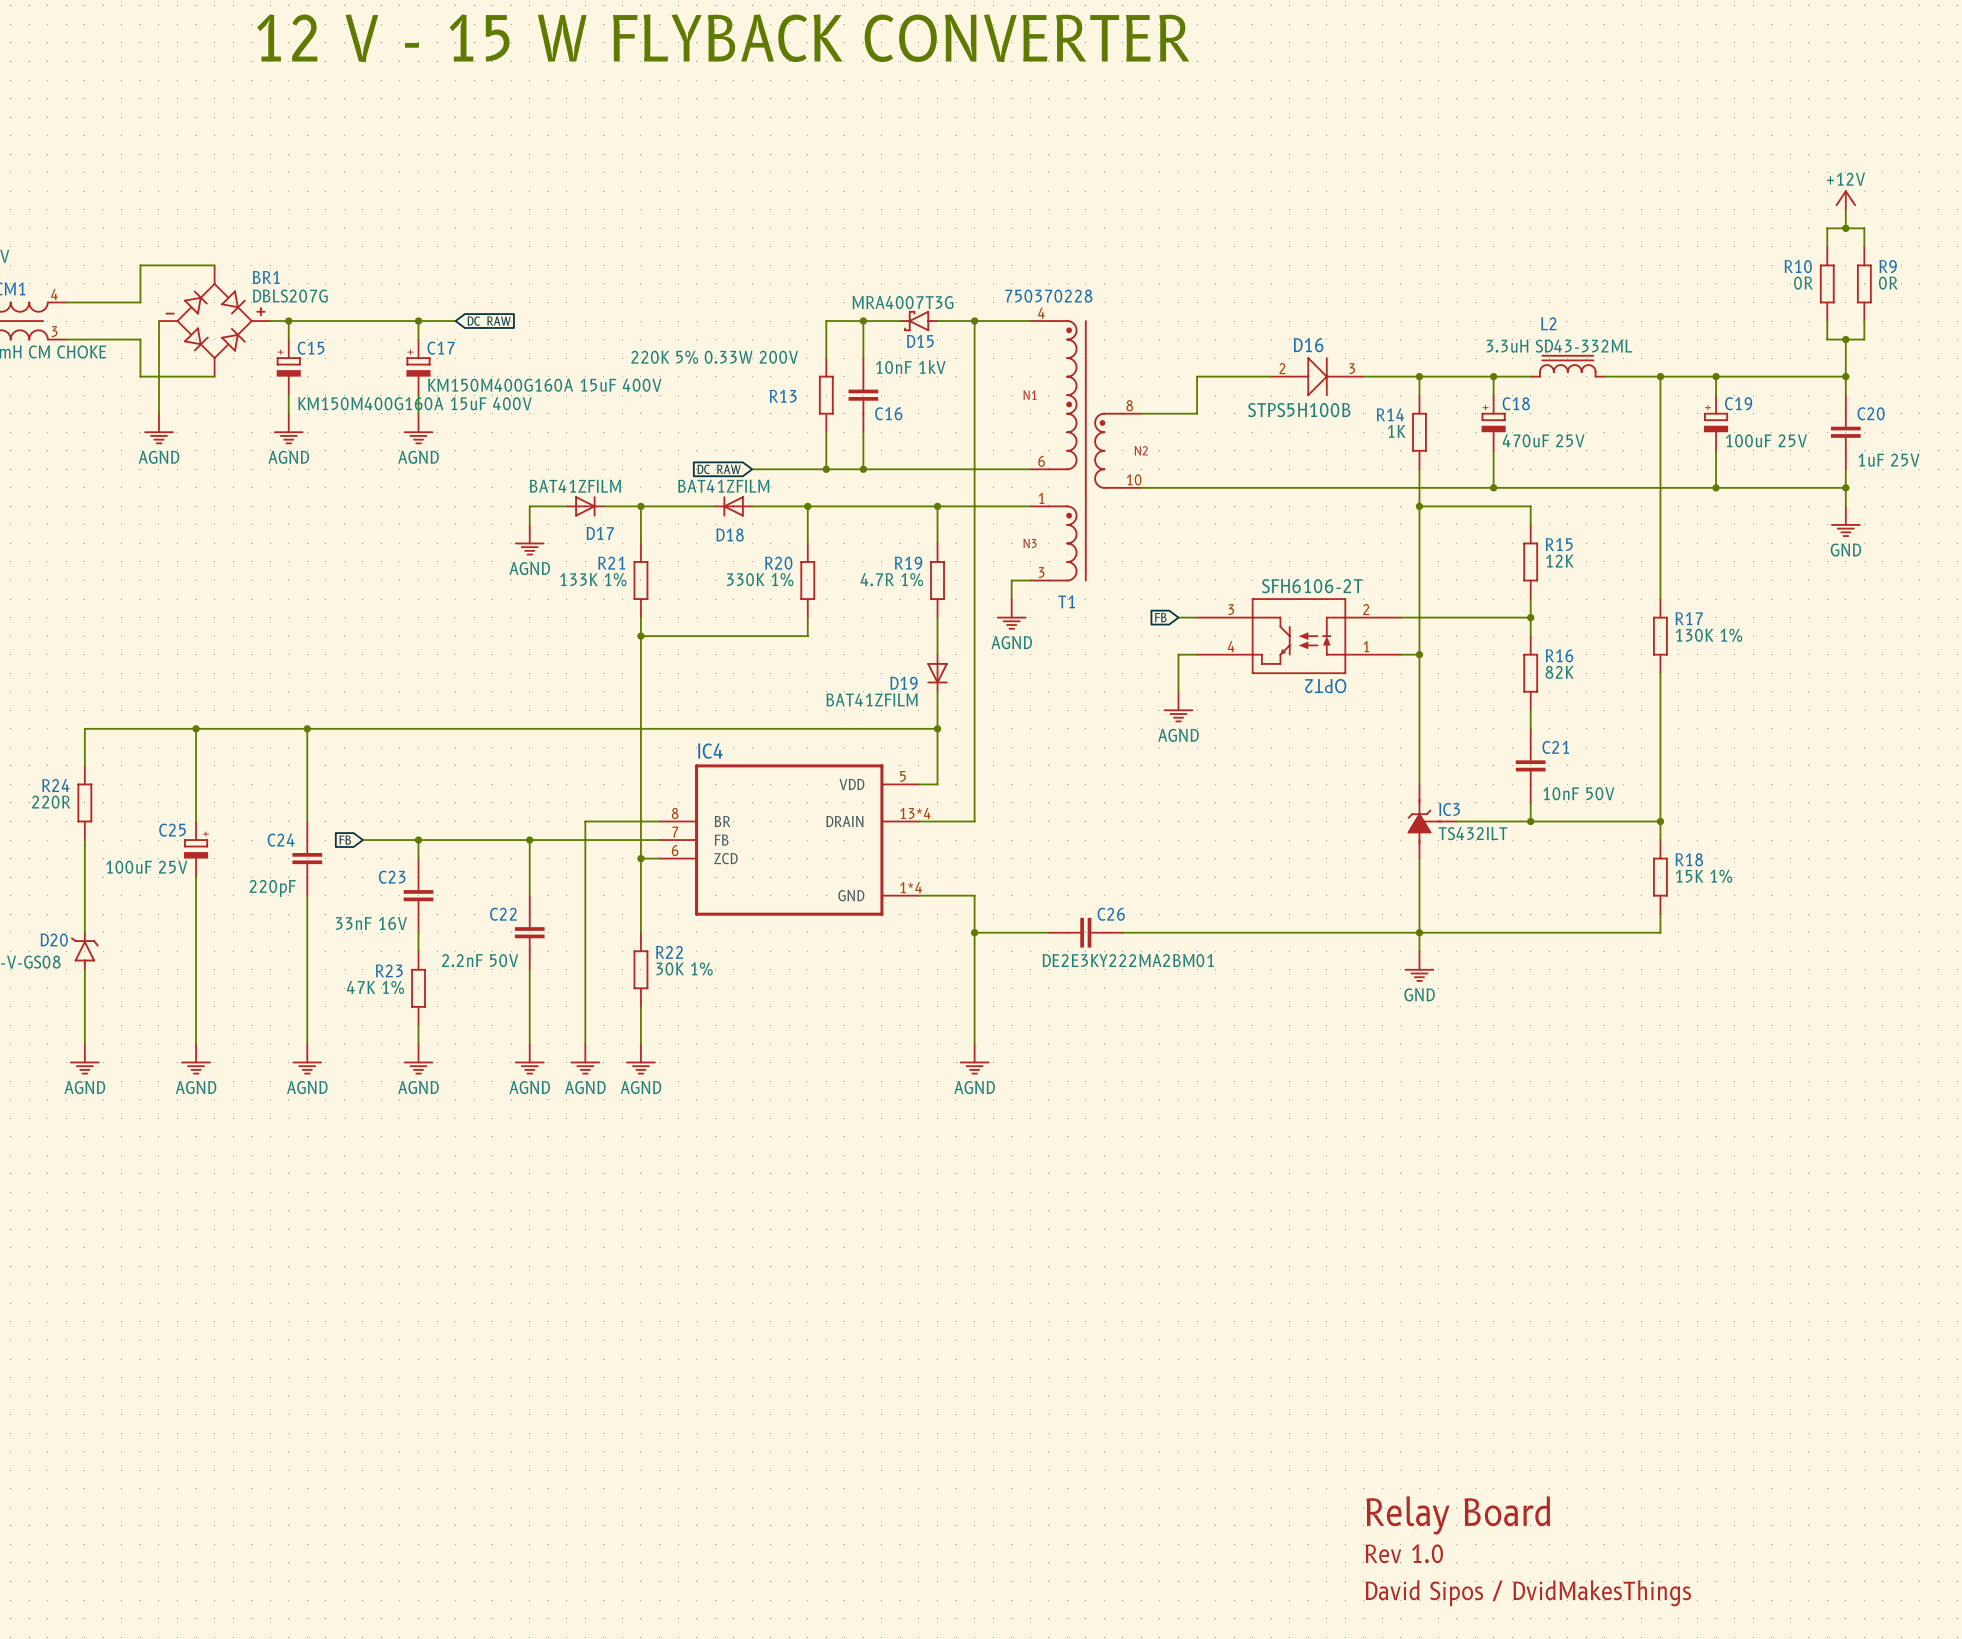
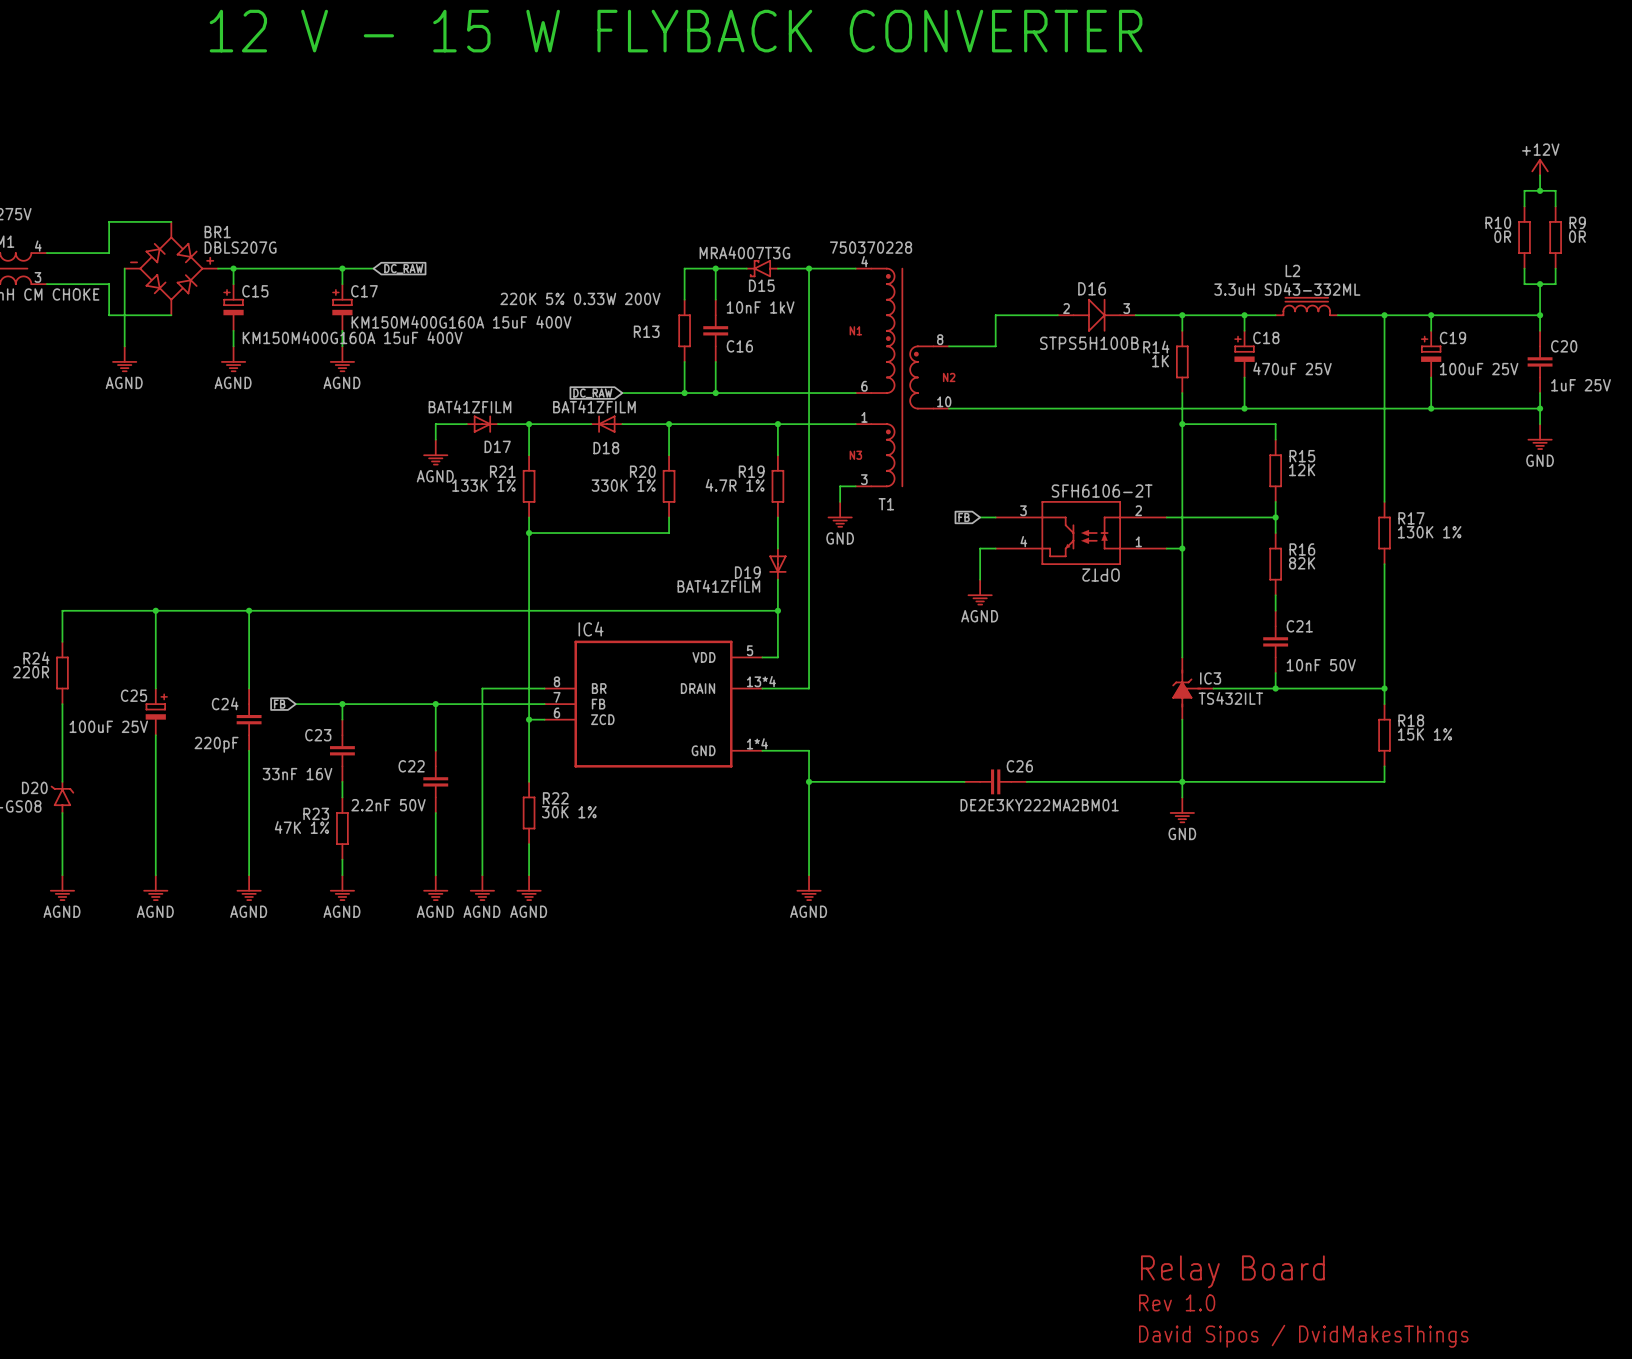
power symbol: AGND (1011, 614) -> GND (840, 514)
C26 position: (1085, 932) -> (995, 781)

